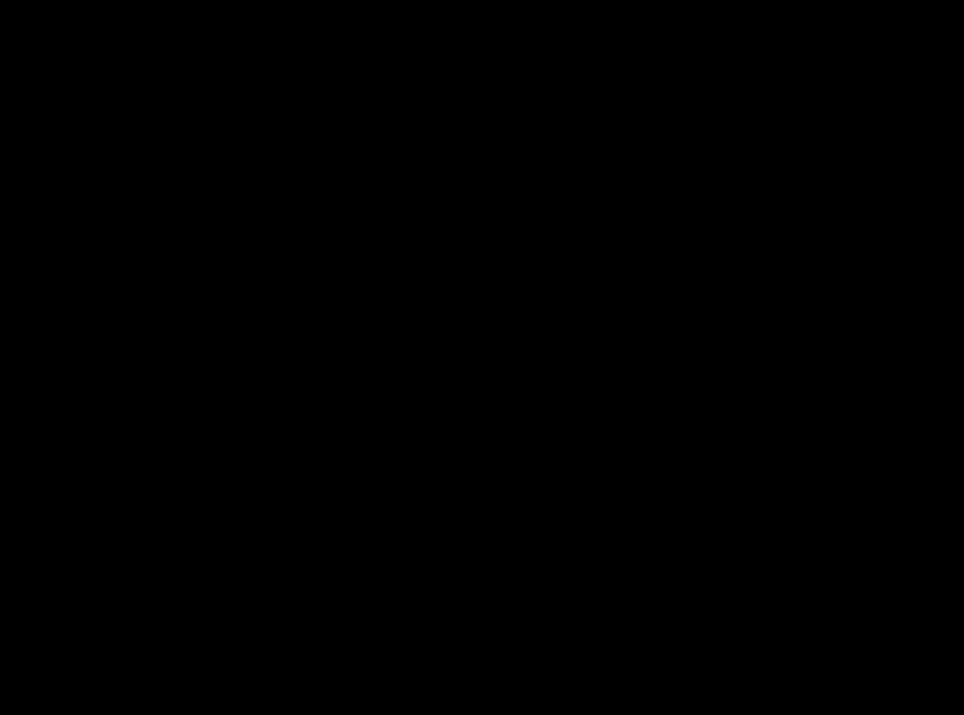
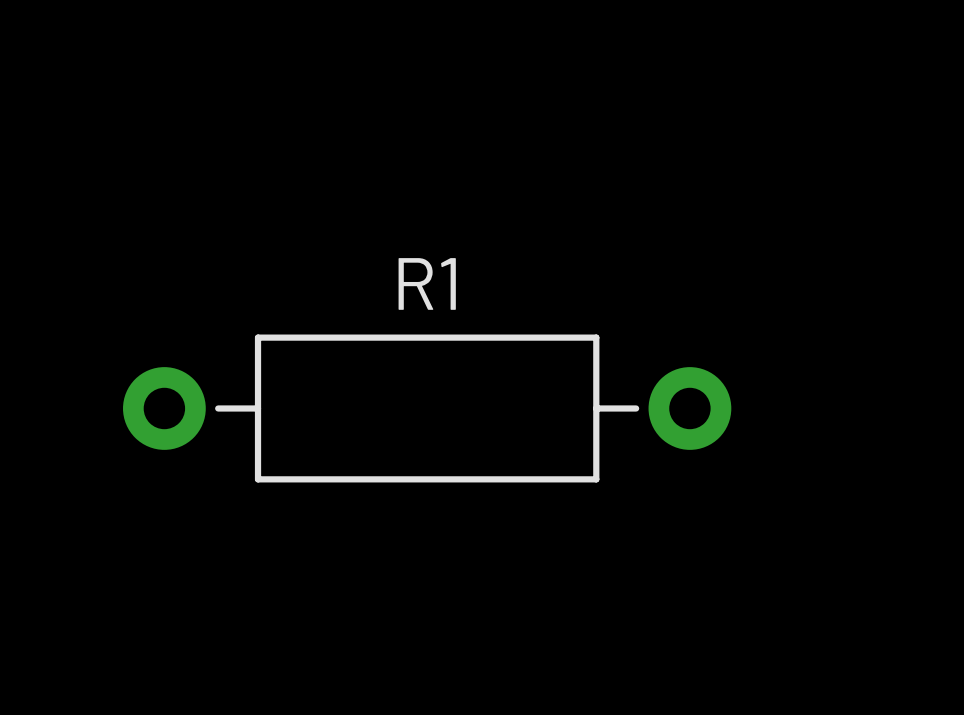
R1: none -> (427, 408)

